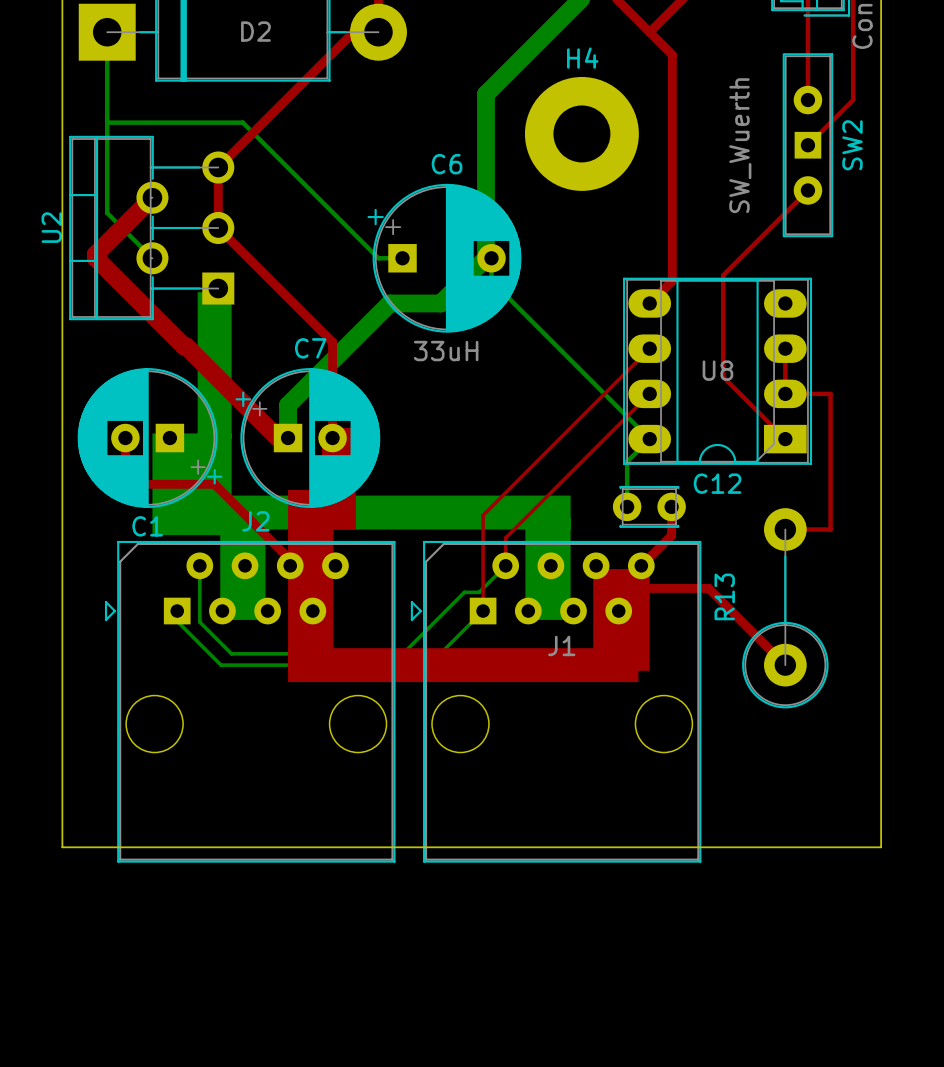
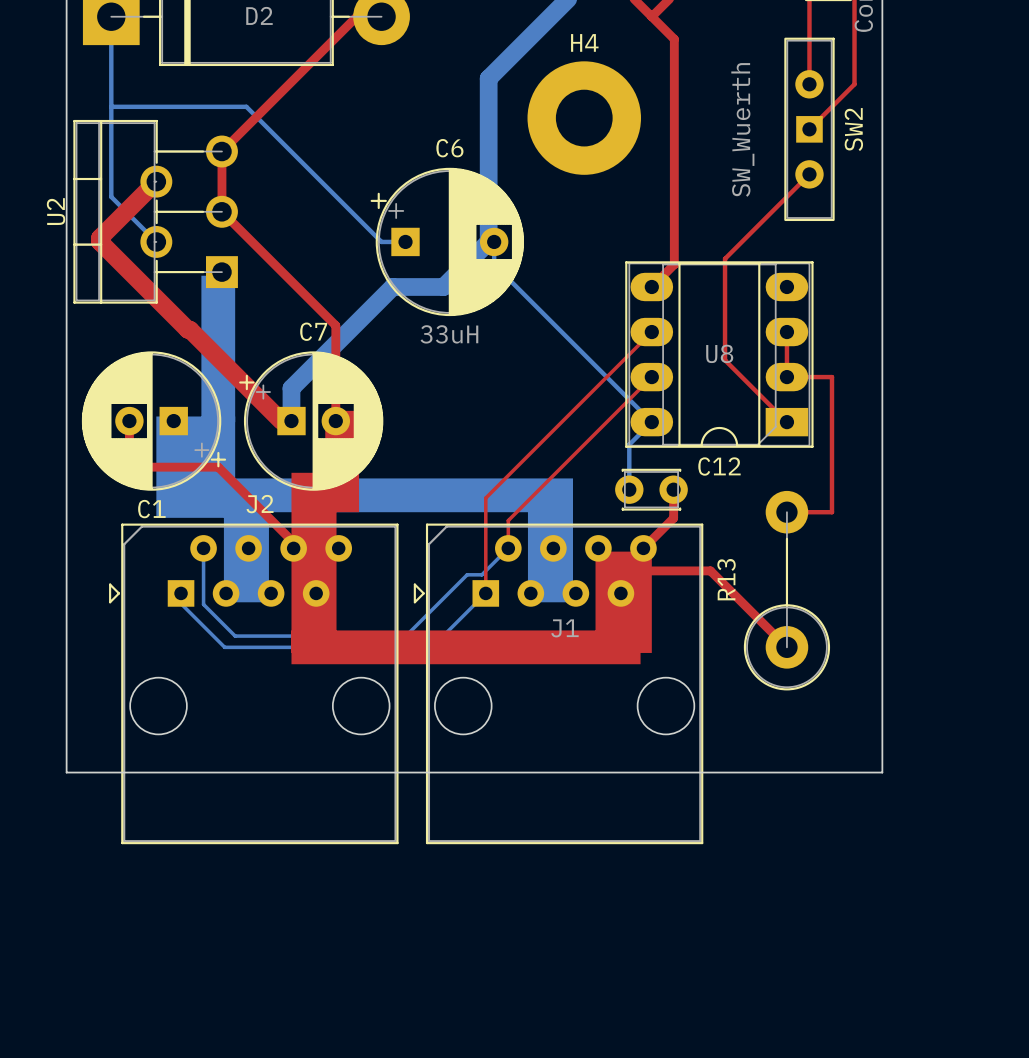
board edge: (62, 790) (62, 847) (881, 847) (881, 790) -> (66, 772) (882, 772)

